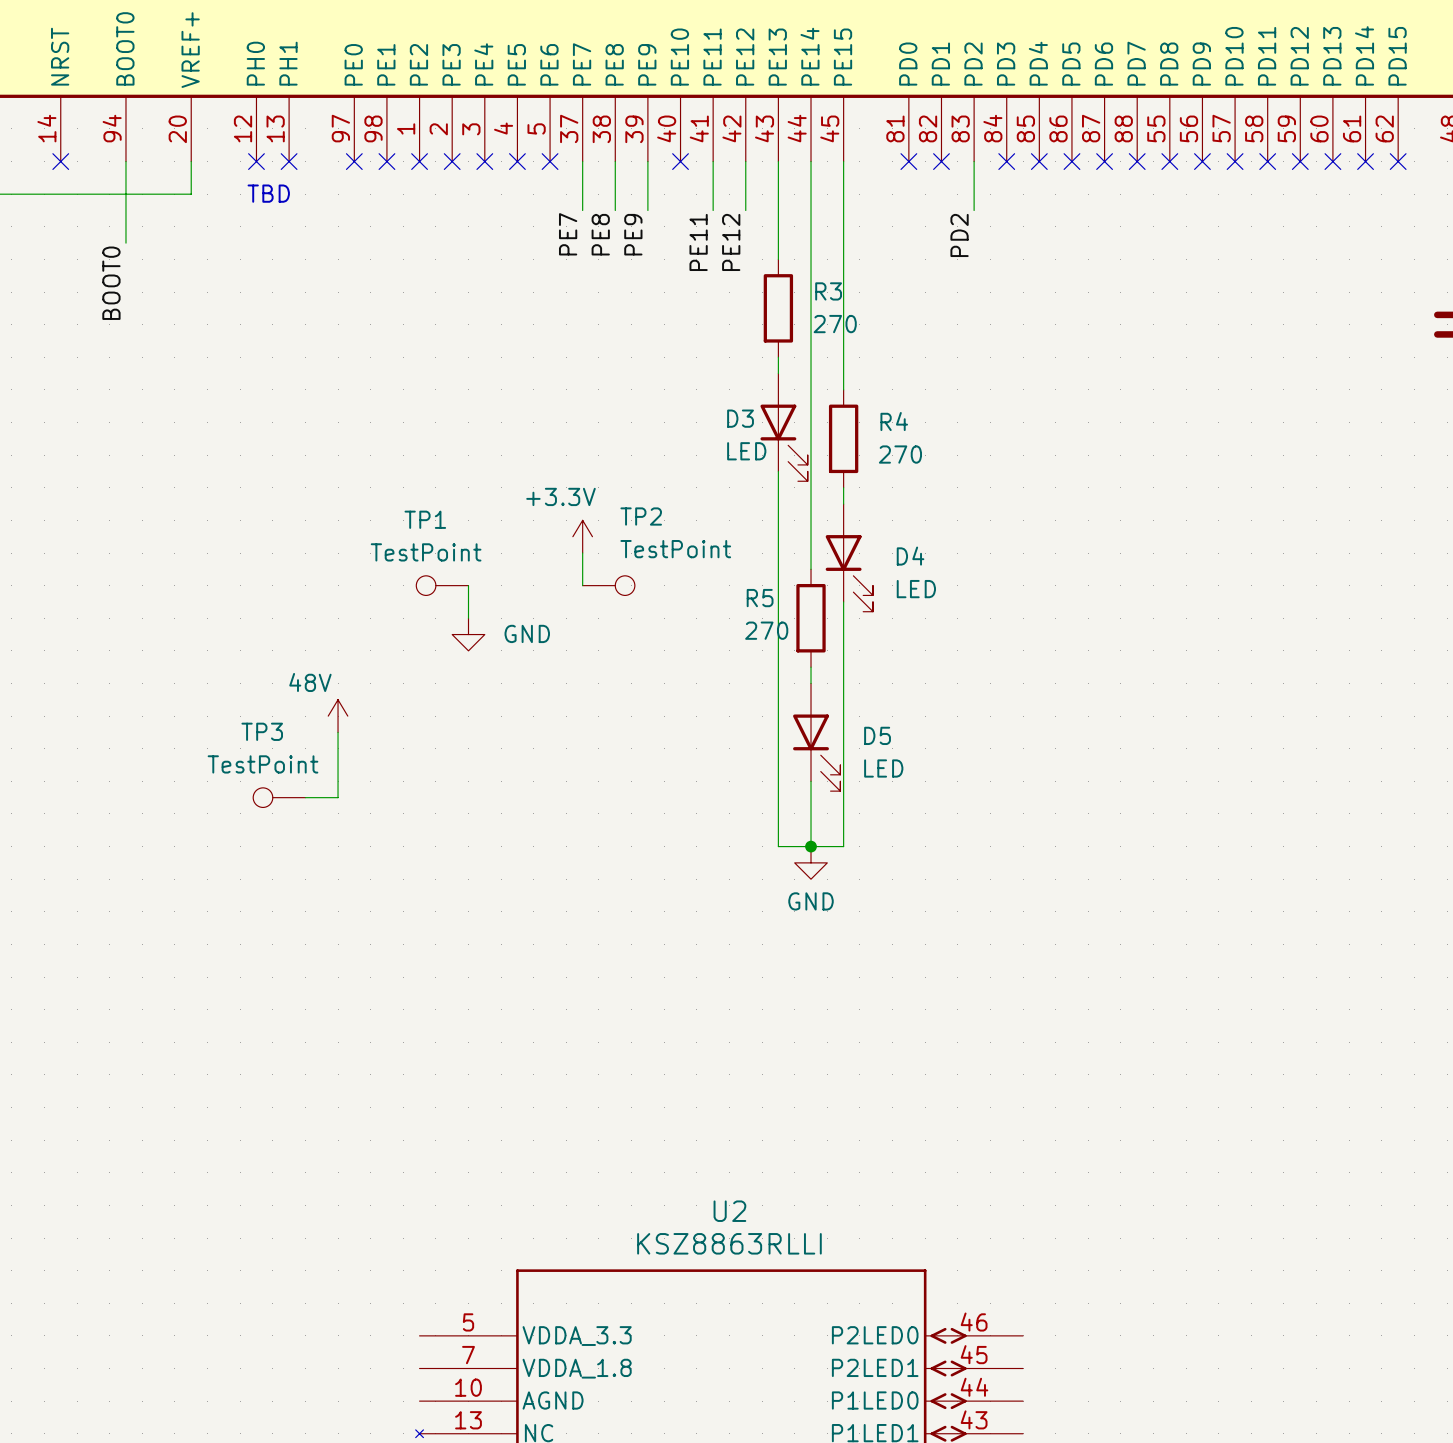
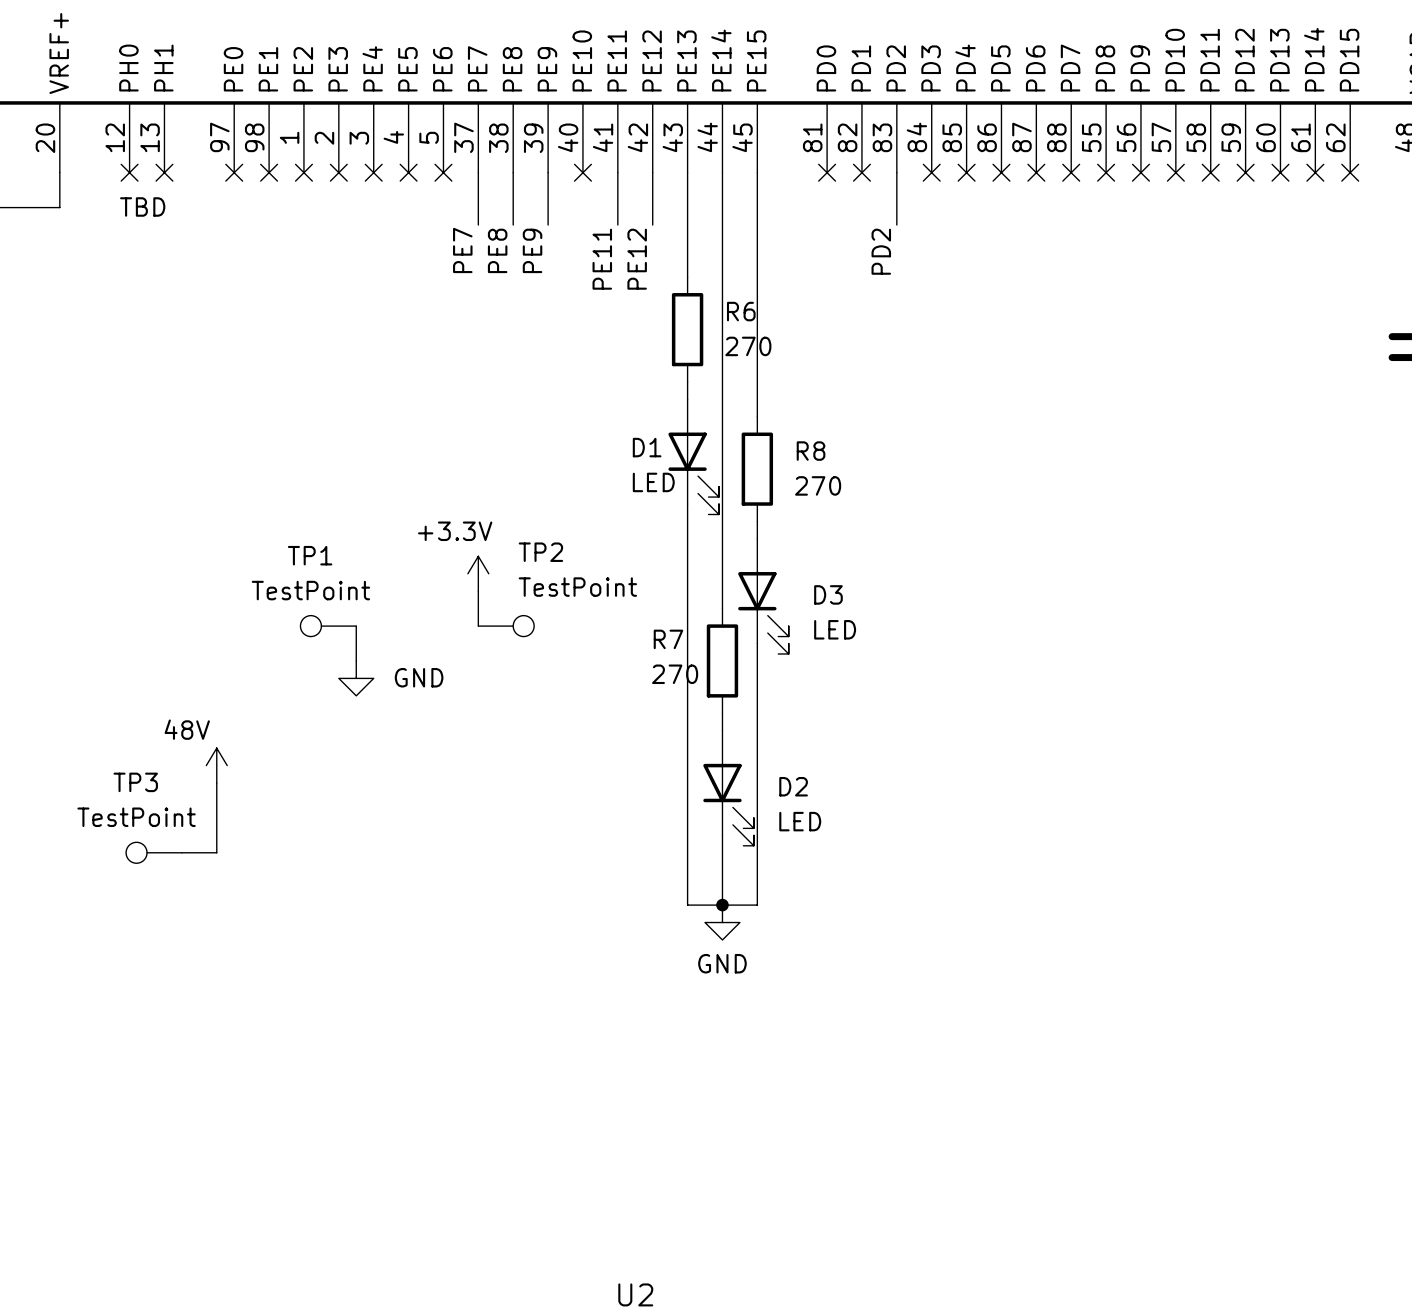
R3 name: R3 (828, 291) -> R6 (741, 311)
D3 name: D3 (740, 418) -> D1 (647, 447)
R4 name: R4 (894, 421) -> R8 (811, 451)
D4 name: D4 (910, 556) -> D3 (828, 594)
R5 name: R5 (760, 598) -> R7 (668, 639)
D5 name: D5 (877, 735) -> D2 (793, 786)

